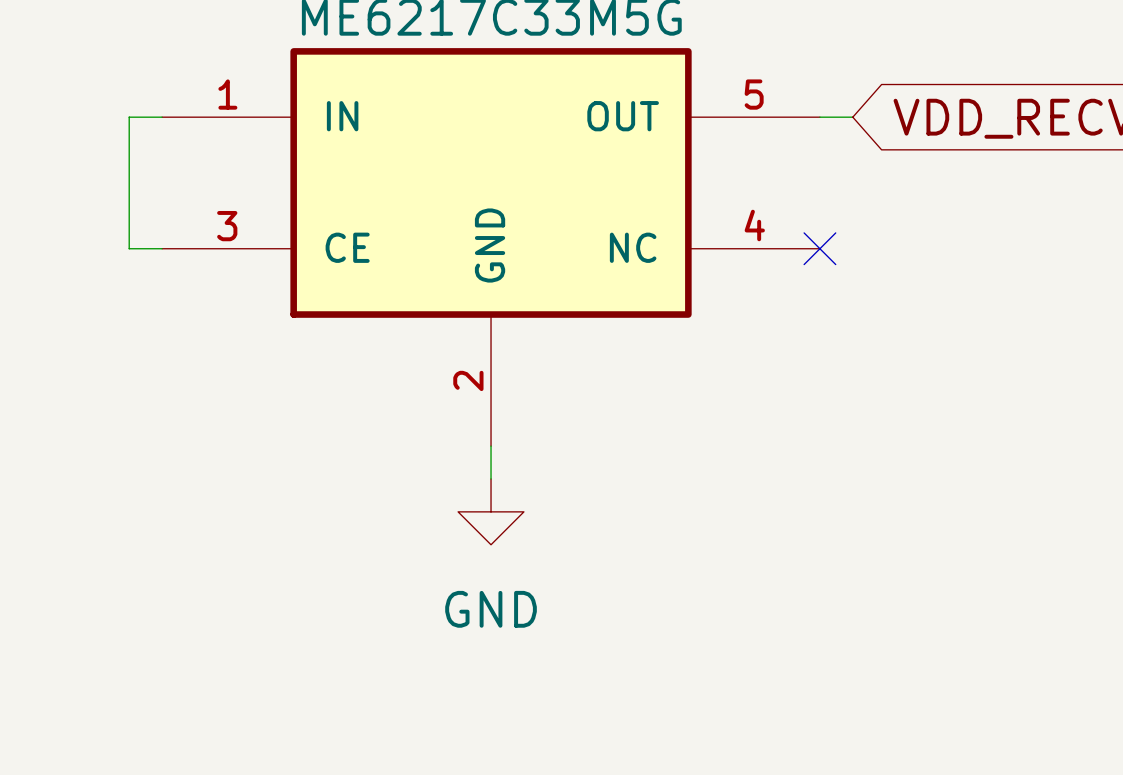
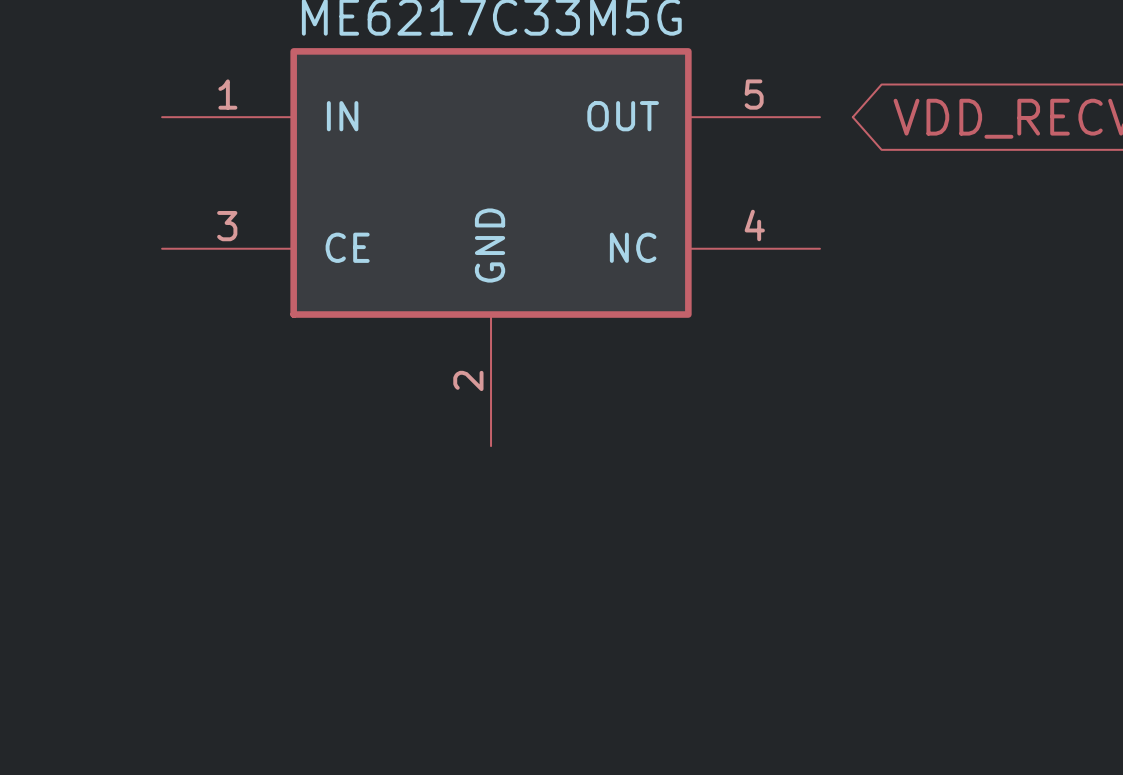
wire: (162, 117) (129, 117) (129, 248) (162, 248) -> none
wire: (819, 117) (852, 117) -> none
no-connect mark: (819, 248) -> none
wire: (491, 446) (491, 478) -> none
power symbol: GND (491, 511) -> none

